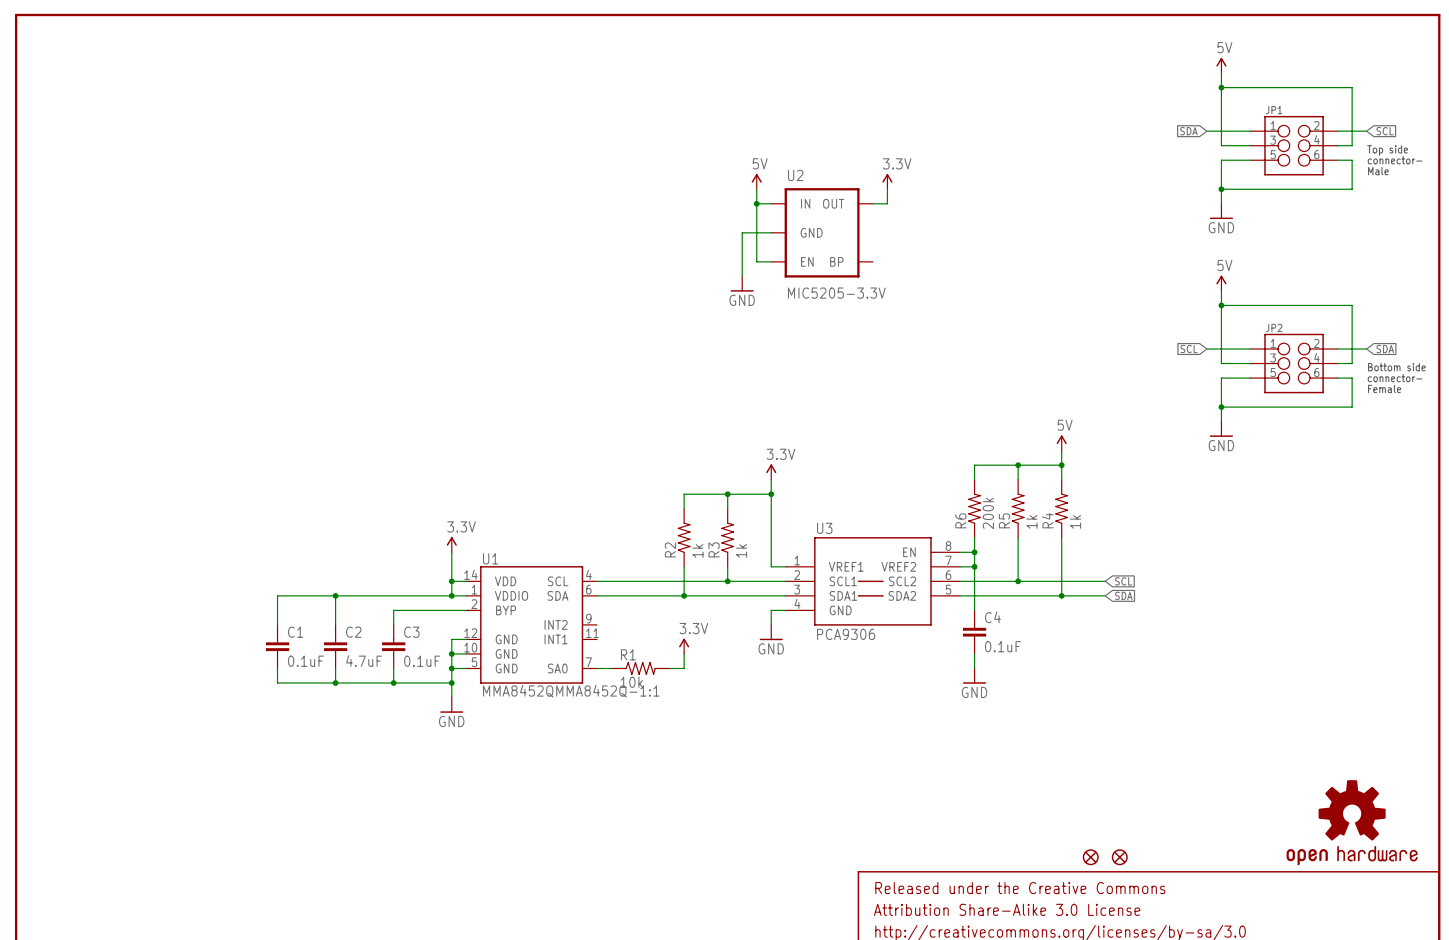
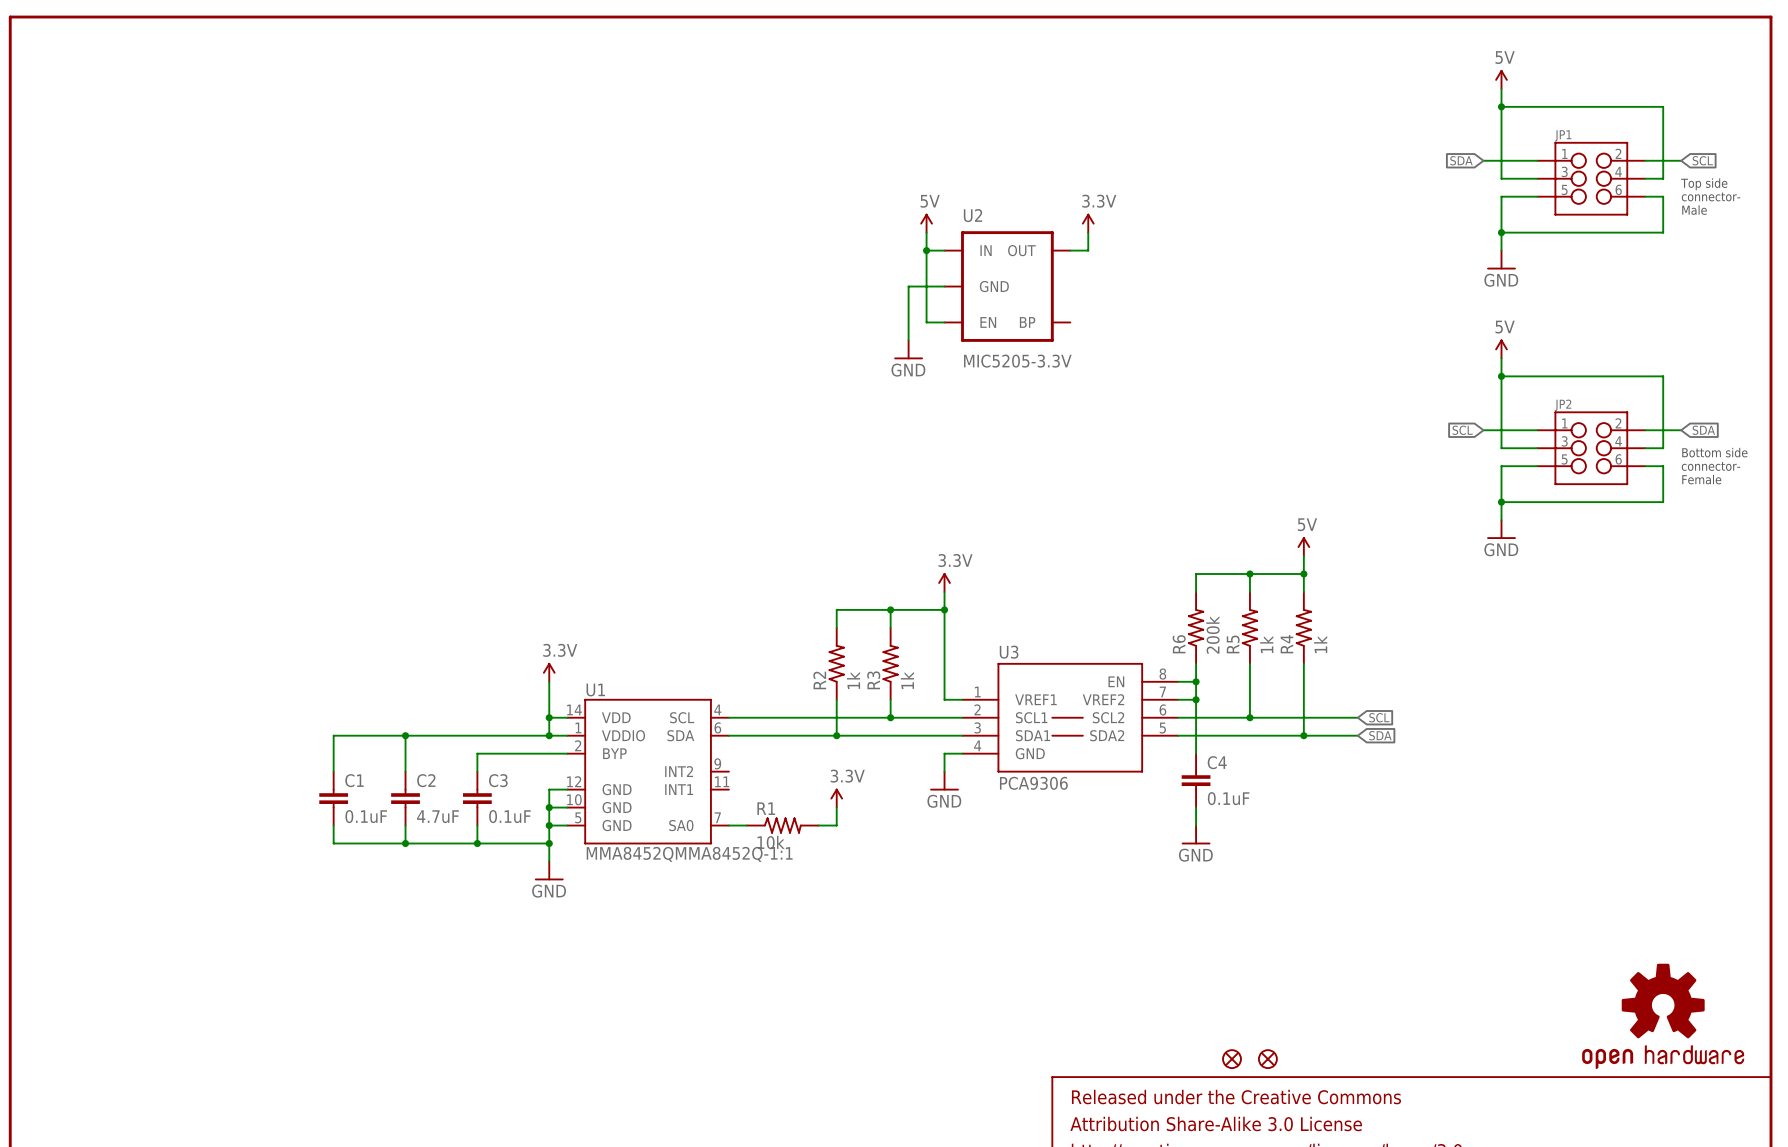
part: none -> (1231, 1059)
part: none -> (1267, 1059)
part: (1090, 857) -> none
part: (1119, 857) -> none

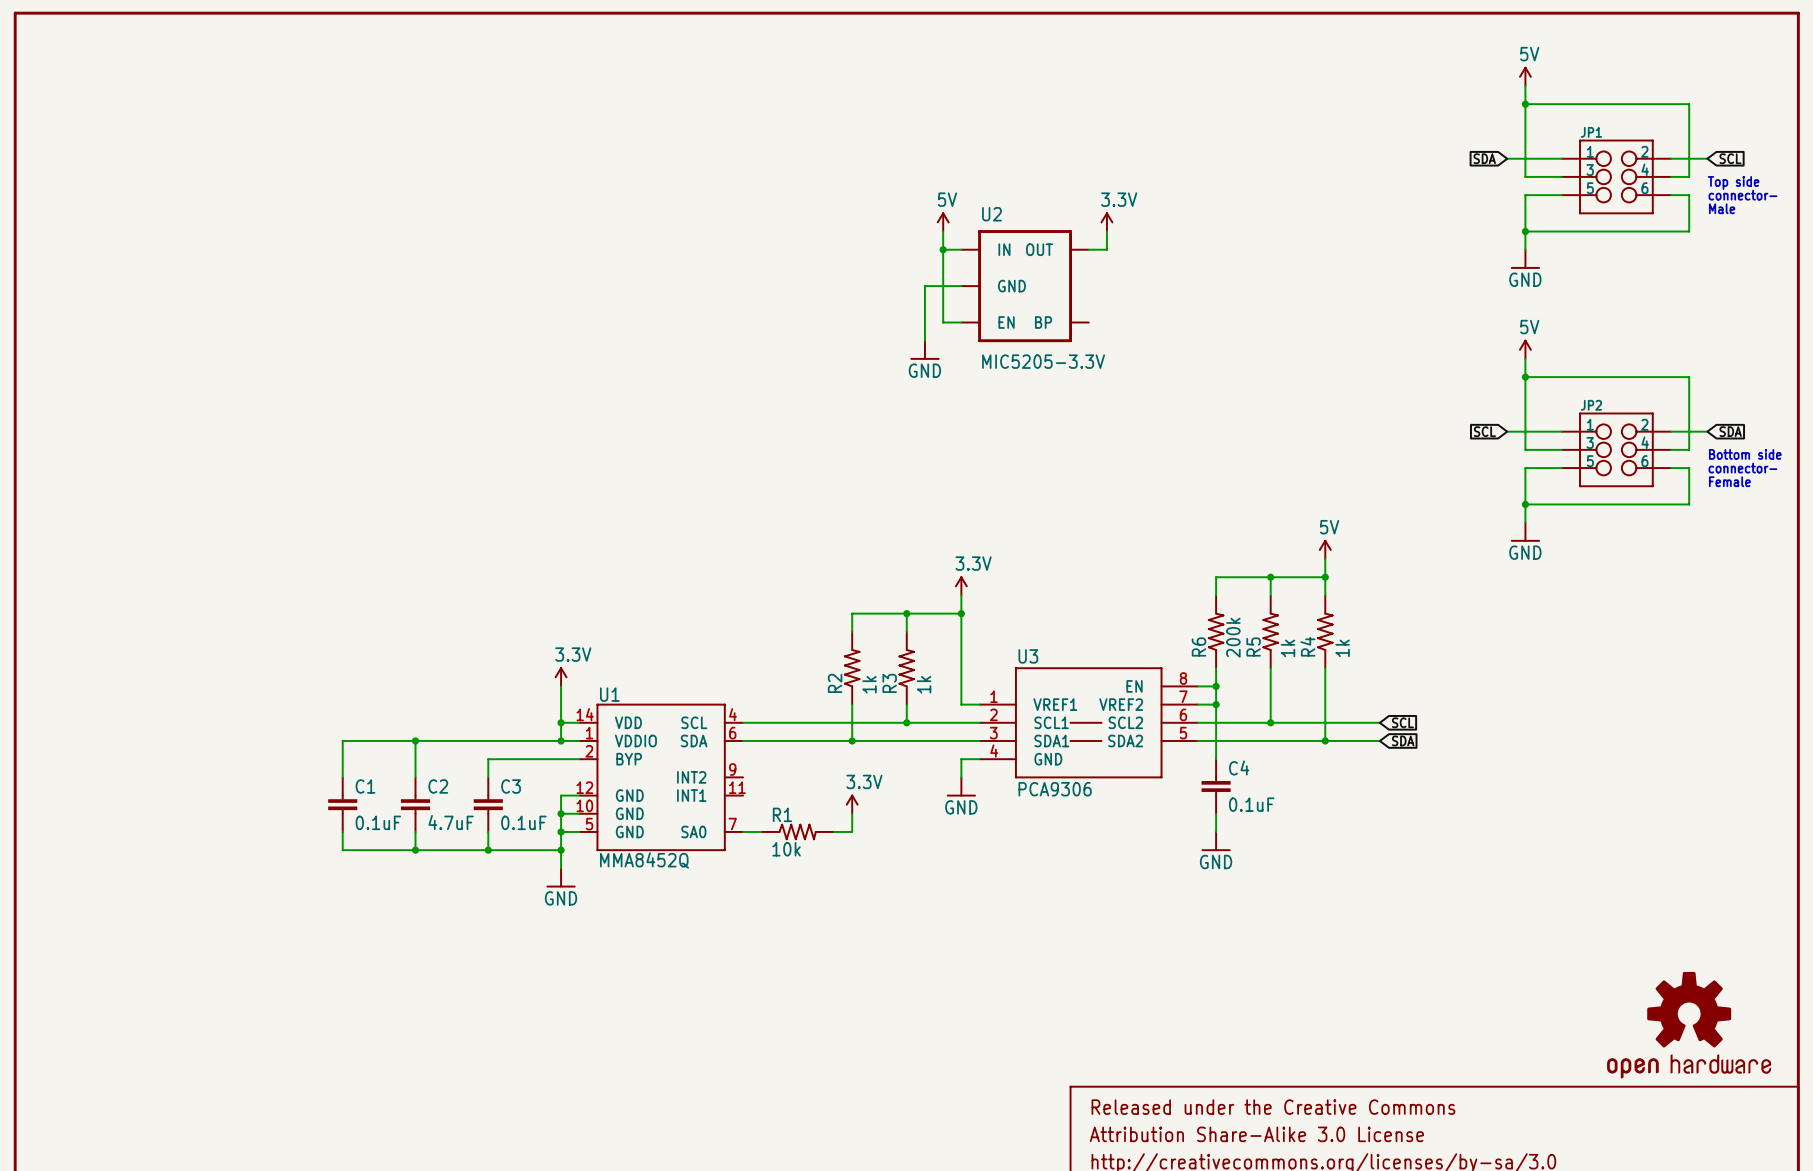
U1 value: MMA8452QMMA8452Q-1:1 (689, 854) -> MMA8452Q (644, 860)
part: (1231, 1059) -> none
part: (1267, 1059) -> none

